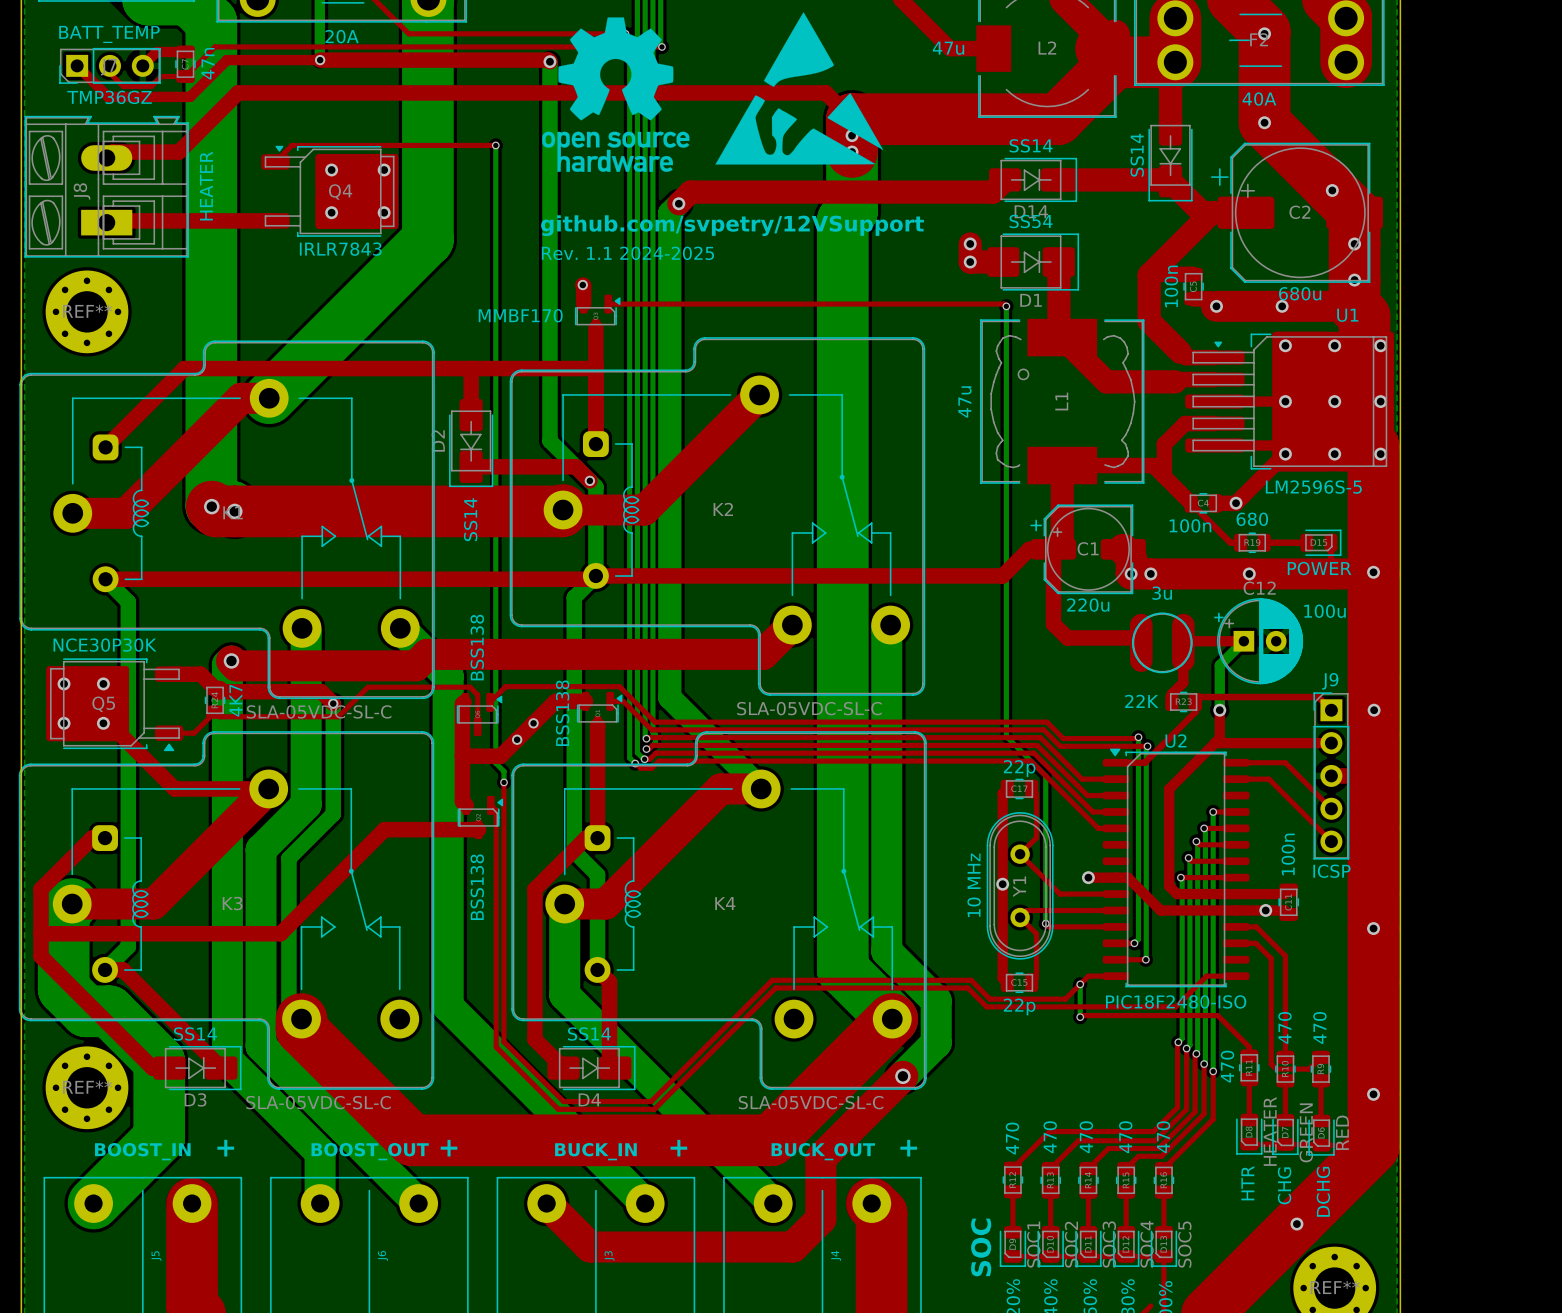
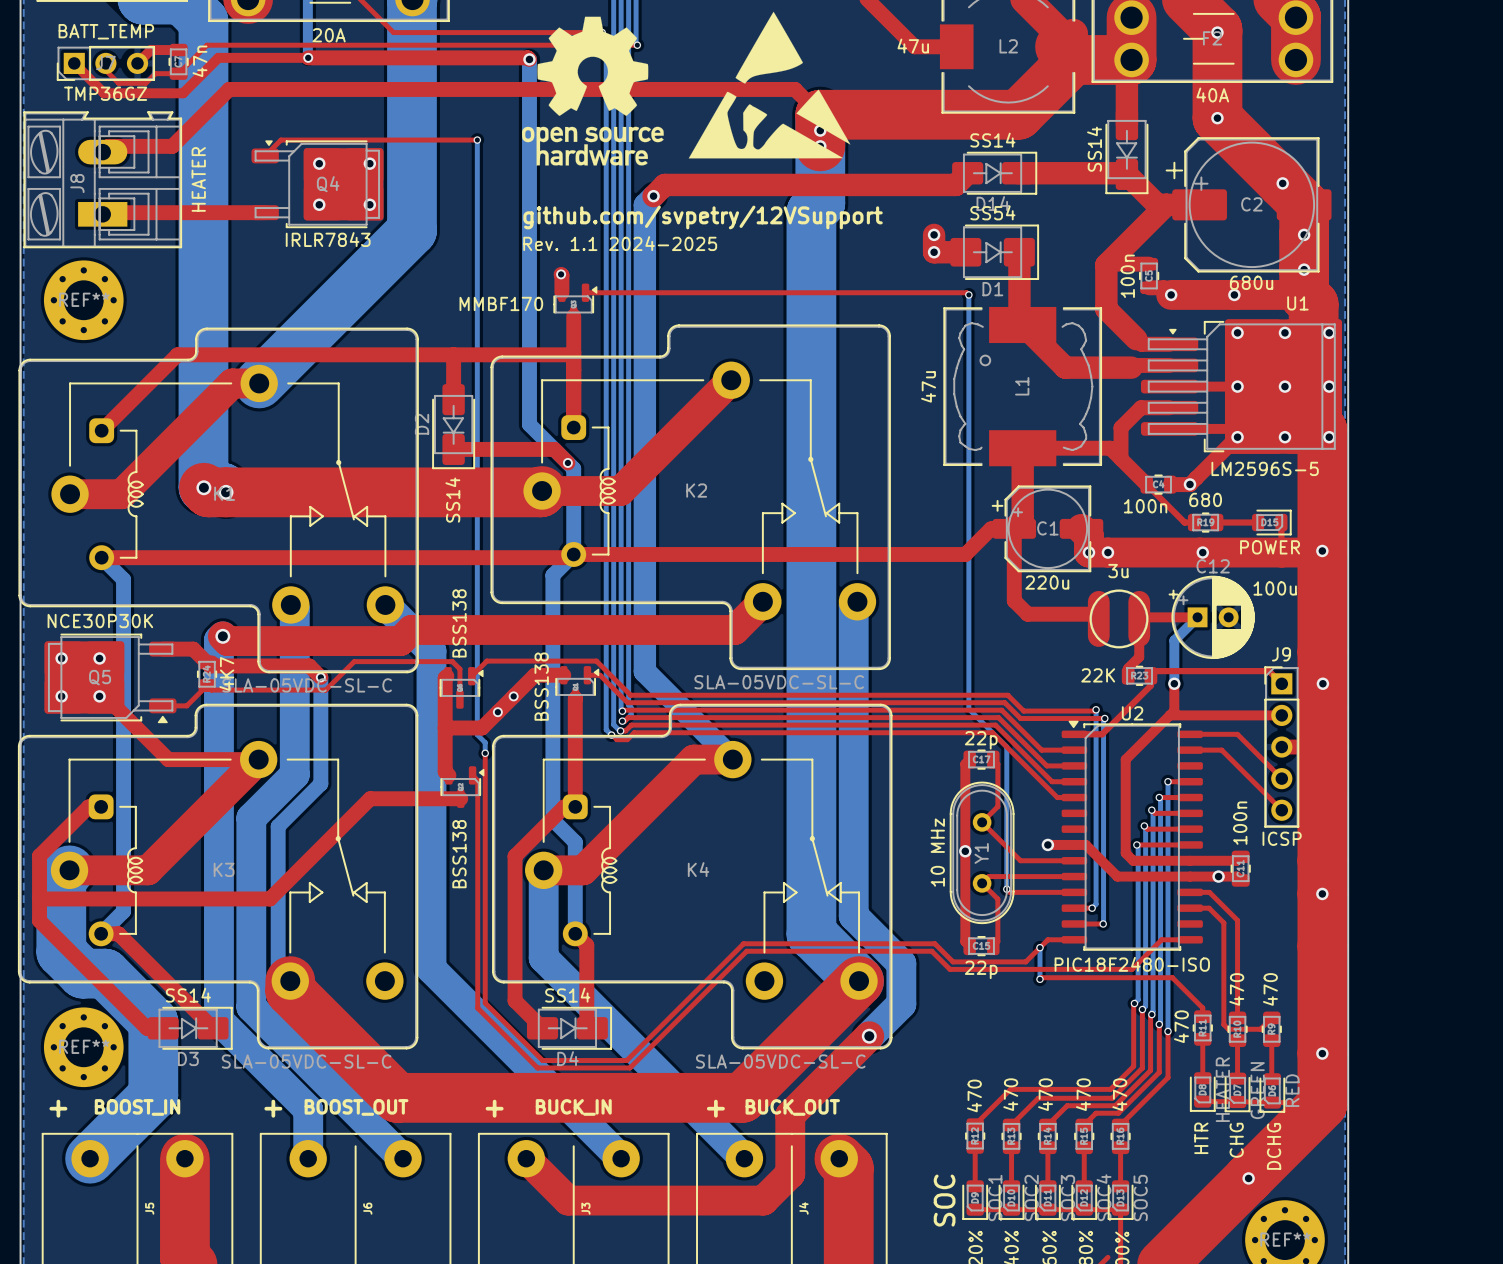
text: none -> + (58, 1108)
text position: + (225, 1148) -> + (273, 1108)
text position: + (449, 1148) -> + (494, 1108)
text position: + (678, 1148) -> + (715, 1108)
text: + (908, 1148) -> none

